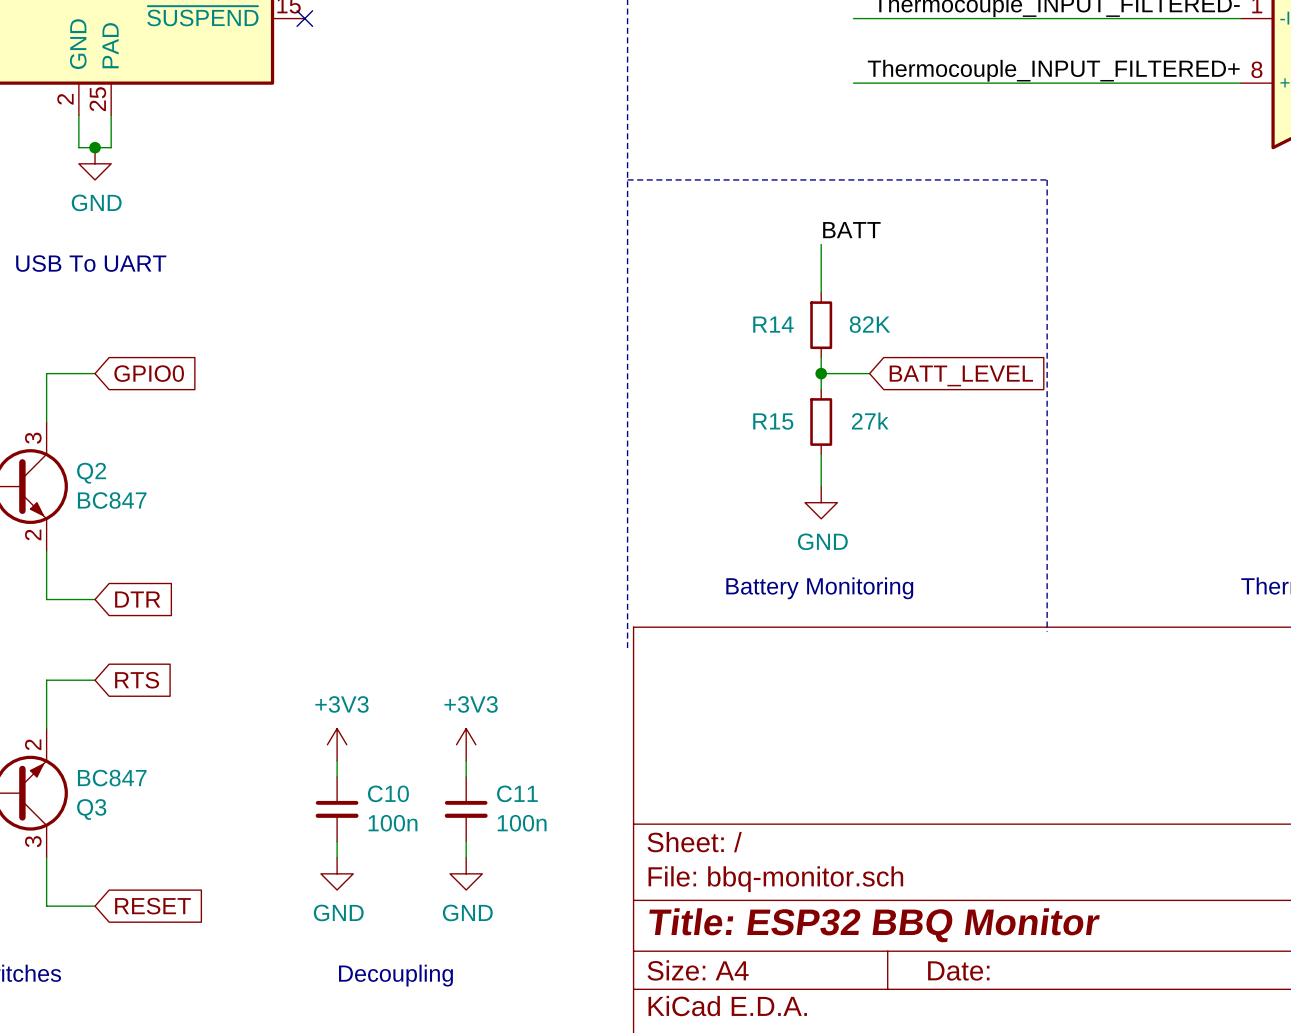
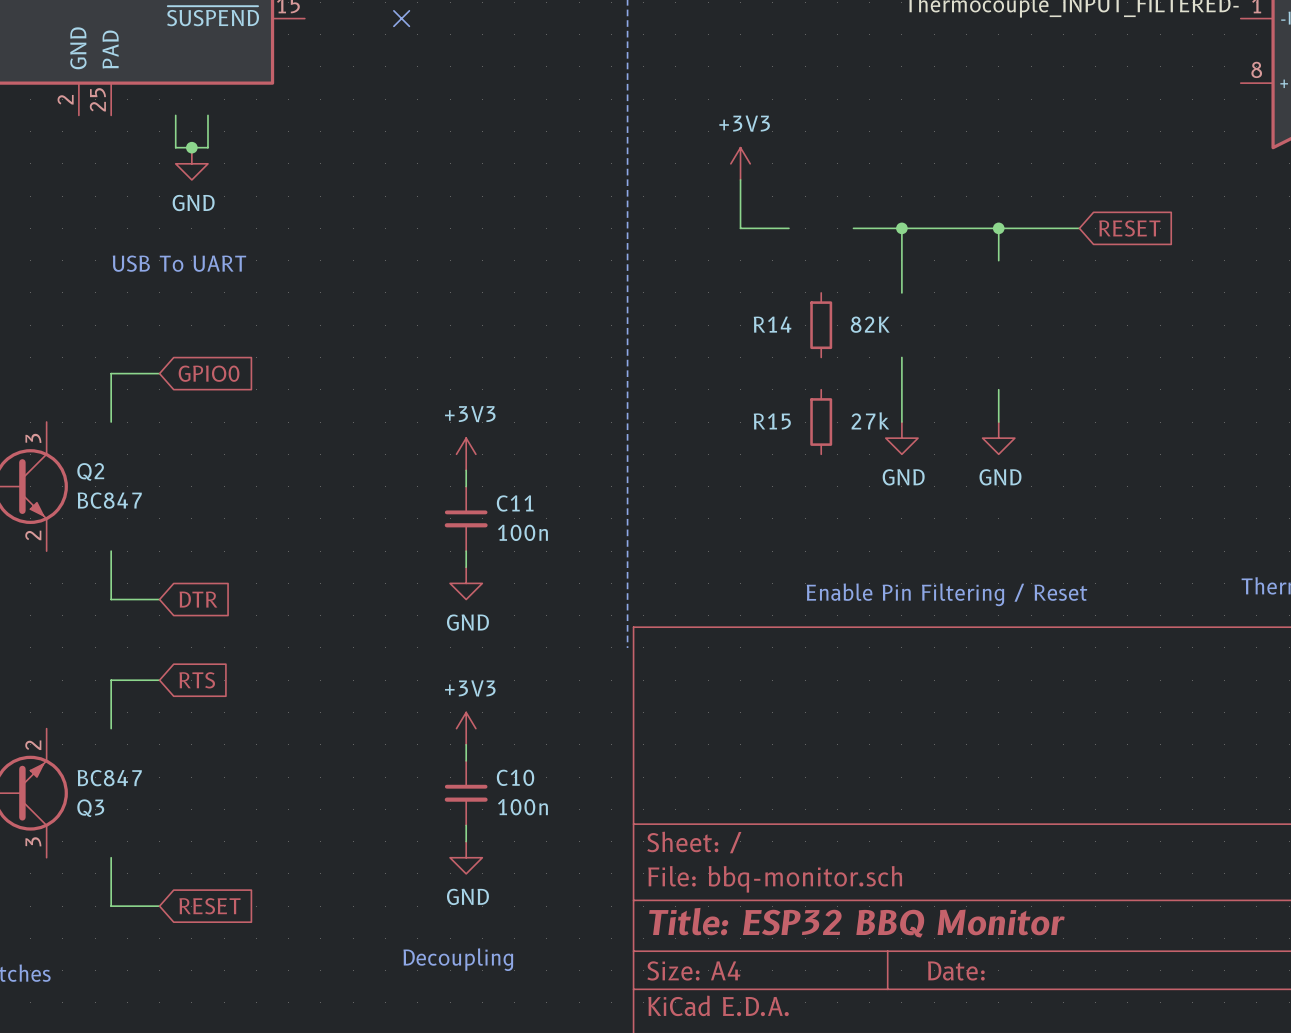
no-connect mark: (304, 18) -> none
no-connect mark: none -> (401, 18)
wire: (853, 18) (1240, 18) -> none
label: Thermocouple_INPUT_FILTERED+ (1053, 70) -> none
wire: (853, 83) (1240, 83) -> none
wire: (78, 115) (78, 147) (111, 147) (111, 115) -> (175, 115) (175, 147) (207, 147) (207, 115)
junction: (95, 147) -> none
junction: none -> (191, 147)
power symbol position: GND (95, 163) -> GND (191, 163)
power symbol: none -> +3V3 (740, 163)
line: (627, 179) (1047, 179) (1047, 631) -> none
wire: none -> (740, 179) (740, 228) (788, 228)
wire: none -> (853, 228) (1079, 228)
wire: none -> (901, 228) (901, 292)
junction: none -> (901, 228)
junction: none -> (998, 228)
global label: none -> RESET (1129, 228)
label: BATT (851, 230) -> none
wire: (821, 244) (821, 292) -> none
text position: USB To UART (91, 263) -> USB To UART (179, 263)
wire: (821, 357) (821, 389) -> (998, 389) (998, 422)
wire: none -> (901, 357) (901, 422)
wire: (95, 373) (46, 373) (46, 422) -> (159, 373) (111, 373) (111, 422)
global label position: GPIO0 (149, 373) -> GPIO0 (209, 373)
wire: (821, 373) (869, 373) -> none
junction: (821, 373) -> none
global label: BATT_LEVEL (961, 375) -> none
power symbol: none -> GND (901, 438)
power symbol: none -> GND (998, 438)
power symbol: none -> +3V3 (466, 454)
wire: (821, 454) (821, 486) -> (998, 228) (998, 260)
wire: none -> (466, 470) (466, 486)
power symbol: GND (821, 502) -> none
wire: (46, 551) (46, 599) (95, 599) -> (111, 551) (111, 599) (159, 599)
power symbol: none -> GND (466, 583)
text: Battery Monitoring (819, 588) -> none
text: none -> Enable Pin Filtering / Reset (946, 594)
global label position: DTR (137, 599) -> DTR (198, 599)
wire: (95, 680) (46, 680) (46, 728) -> (159, 680) (111, 680) (111, 728)
global label position: RTS (137, 680) -> RTS (197, 680)
power symbol: +3V3 (337, 744) -> none
power symbol position: +3V3 (466, 744) -> +3V3 (466, 728)
wire: (337, 760) (337, 777) -> (466, 551) (466, 567)
C10 position: (337, 809) -> (466, 793)
C11 position: (466, 809) -> (466, 518)
wire: (337, 841) (337, 857) -> none
wire: (46, 857) (46, 906) (95, 906) -> (111, 857) (111, 906) (159, 906)
power symbol: GND (337, 873) -> none
power symbol position: GND (466, 873) -> GND (466, 857)
global label position: RESET (152, 906) -> RESET (209, 906)
text position: Decoupling (395, 975) -> Decoupling (458, 959)

